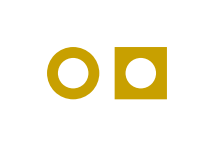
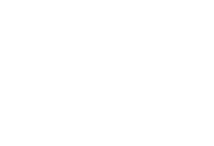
part: (106, 73) -> none

